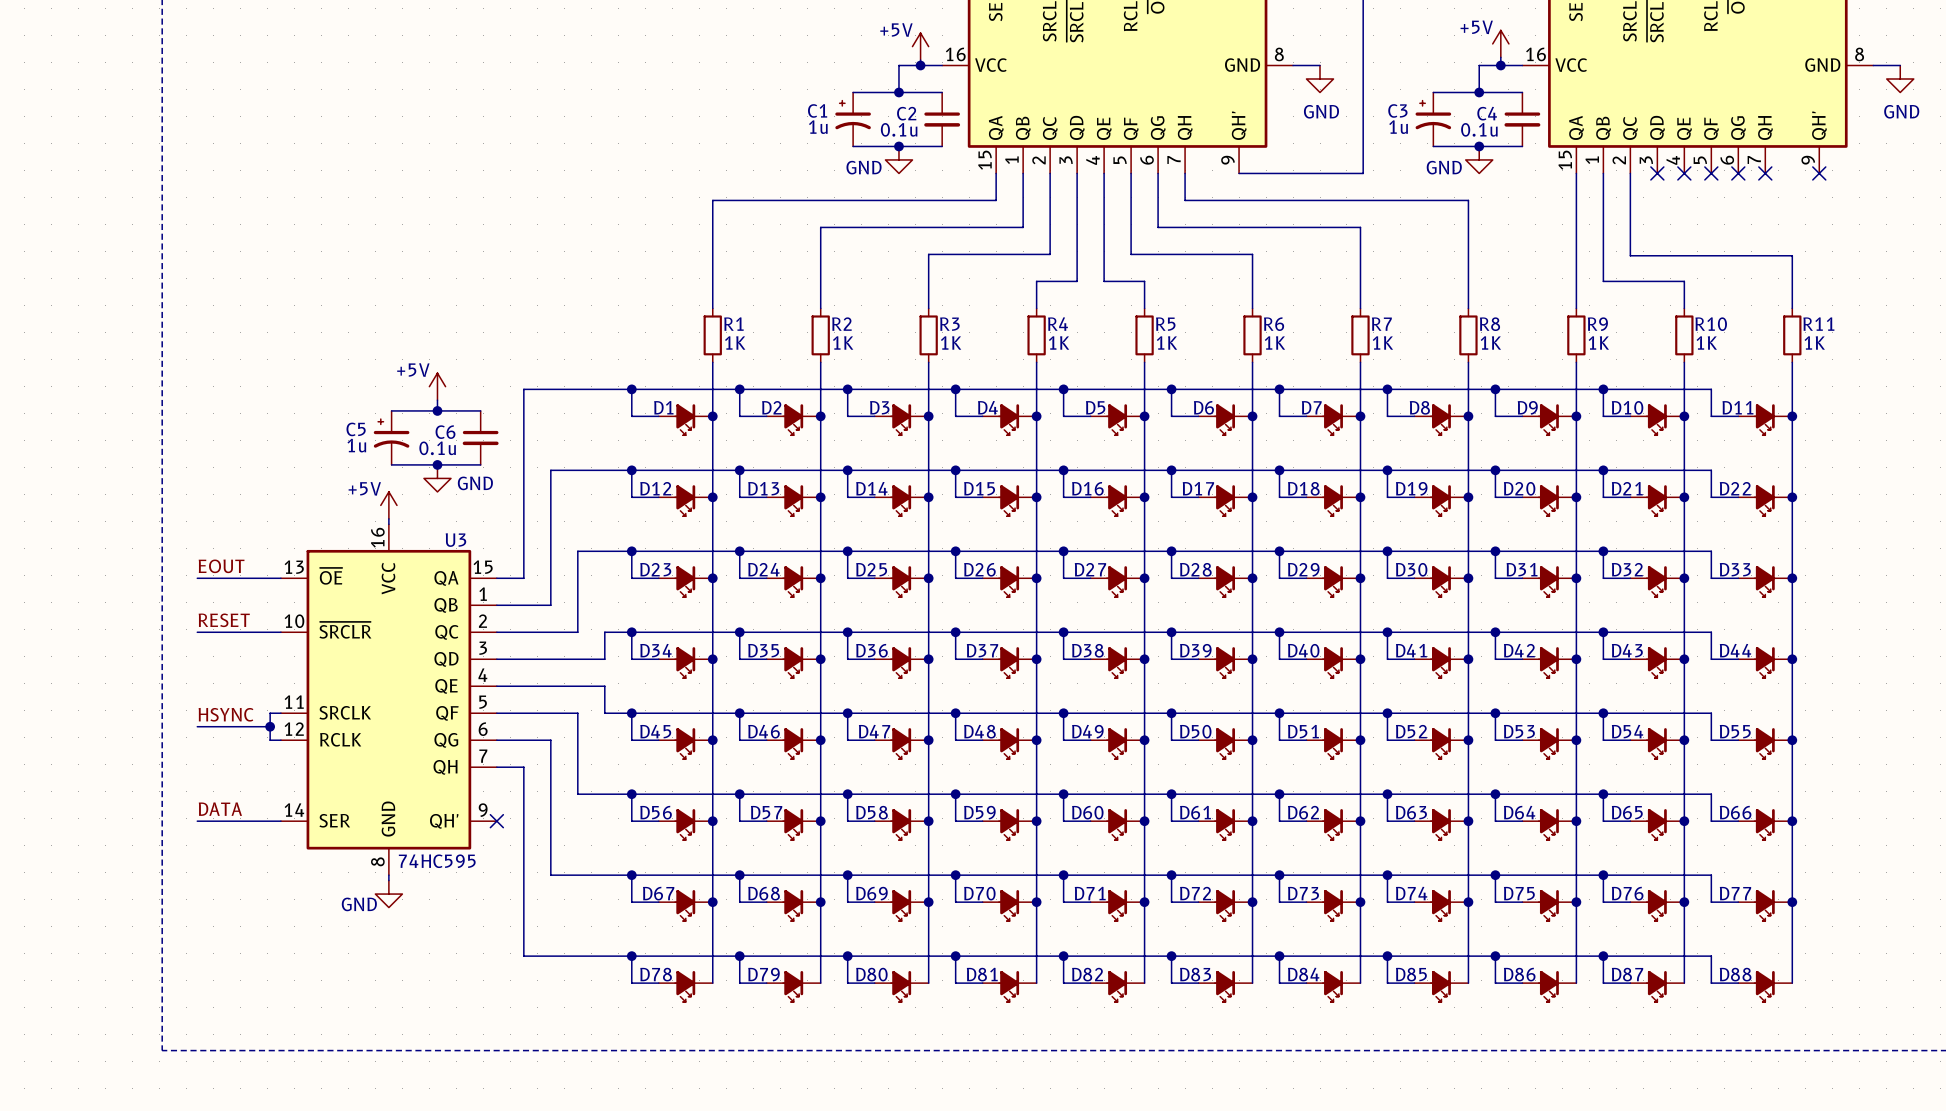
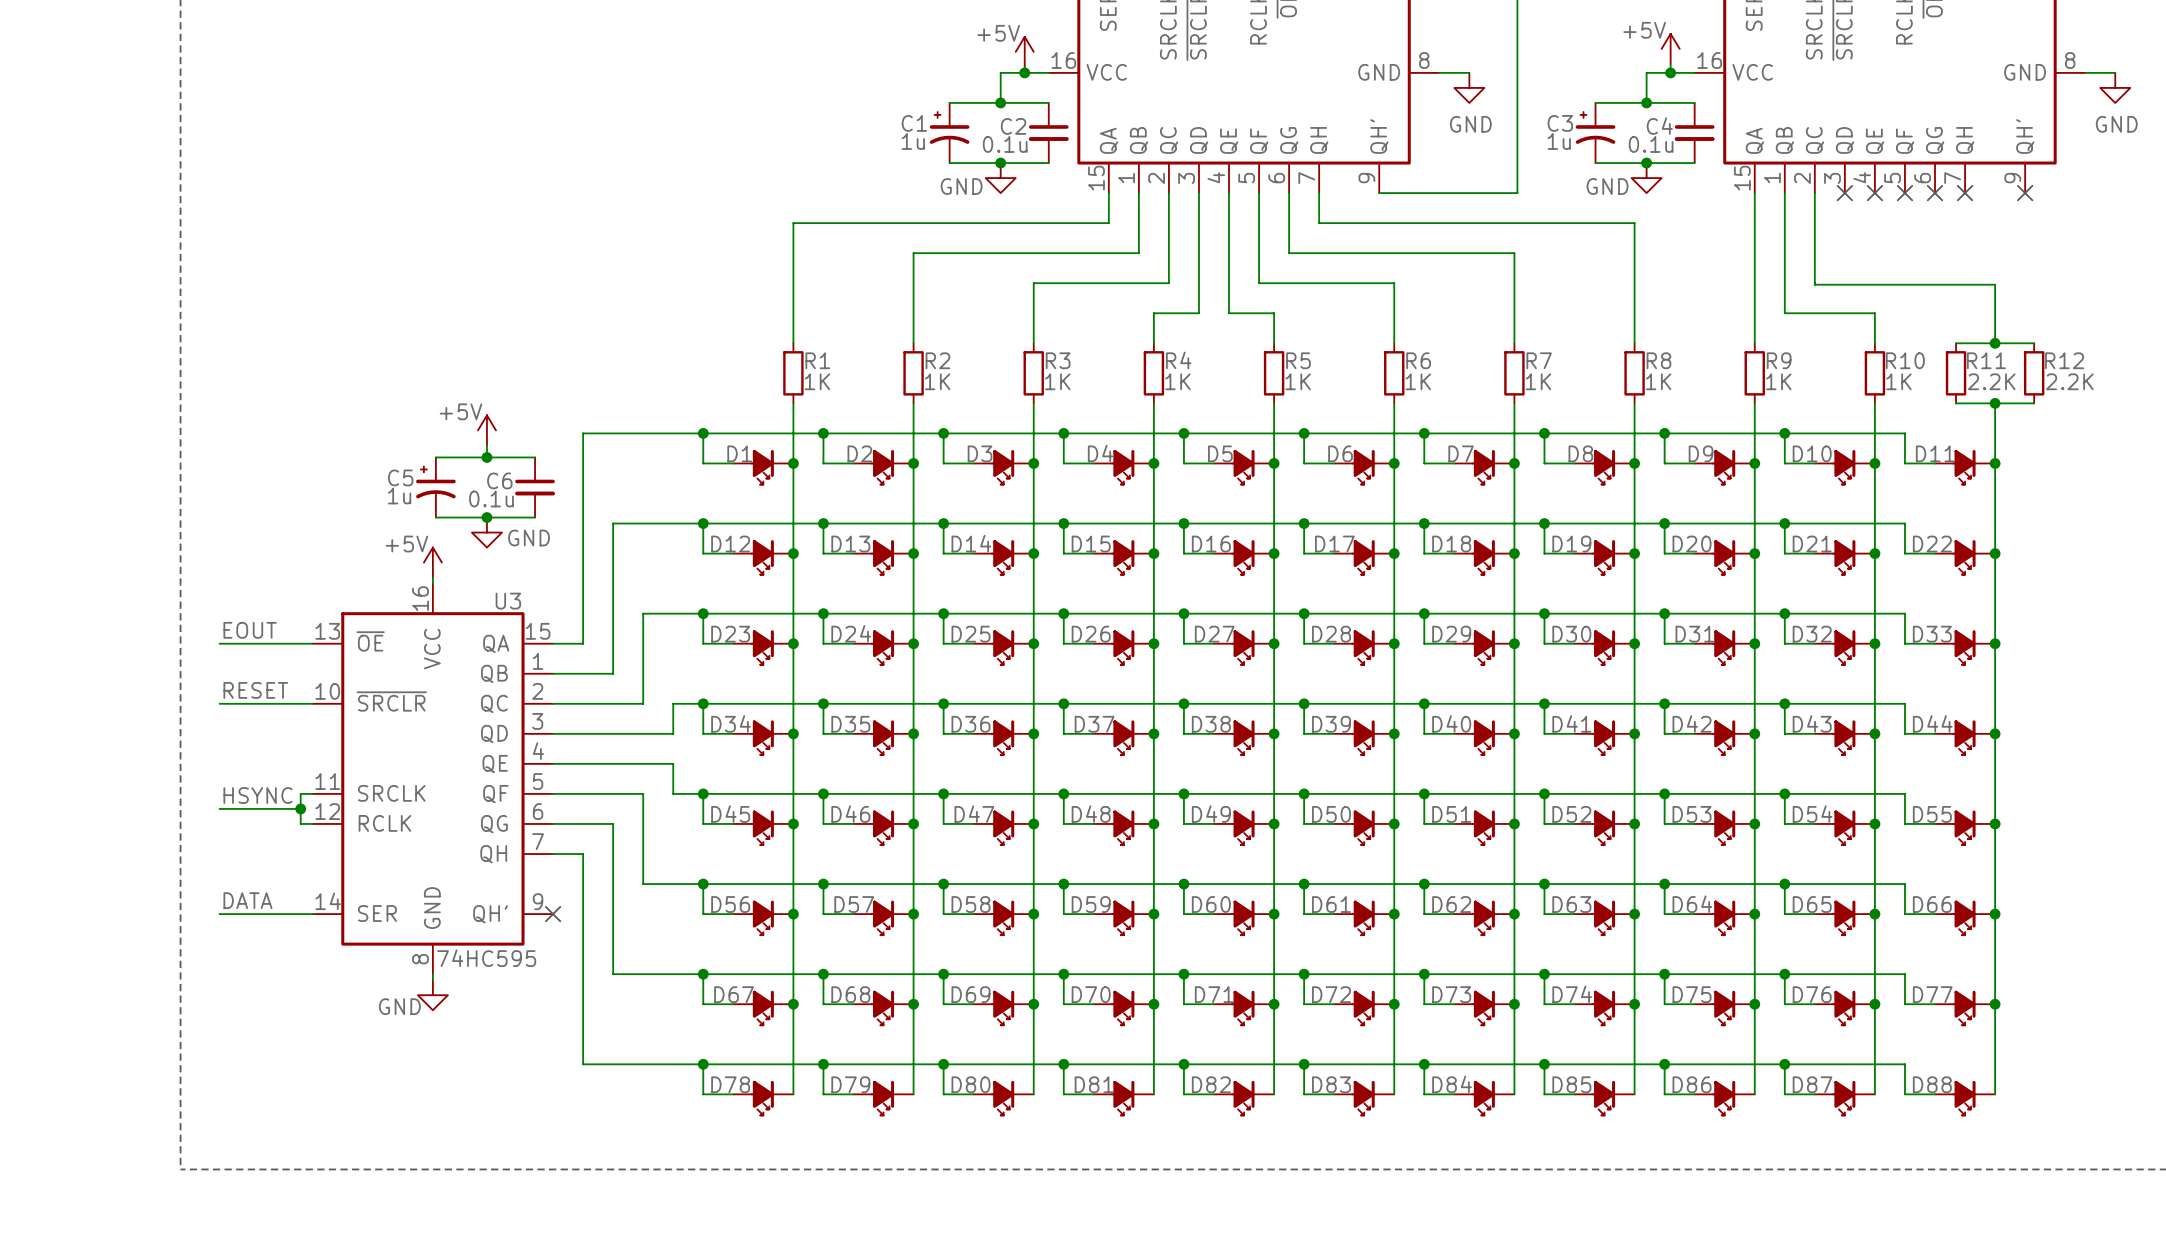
wire: none -> (1956, 343) (2034, 343)
junction: none -> (1995, 343)
R11 position: (1792, 335) -> (1956, 373)
R12: none -> 2.2K (2034, 373)
R11 value: 1K (1814, 342) -> 2.2K (1991, 381)
wire: none -> (1956, 403) (2034, 403)
junction: none -> (1995, 403)

